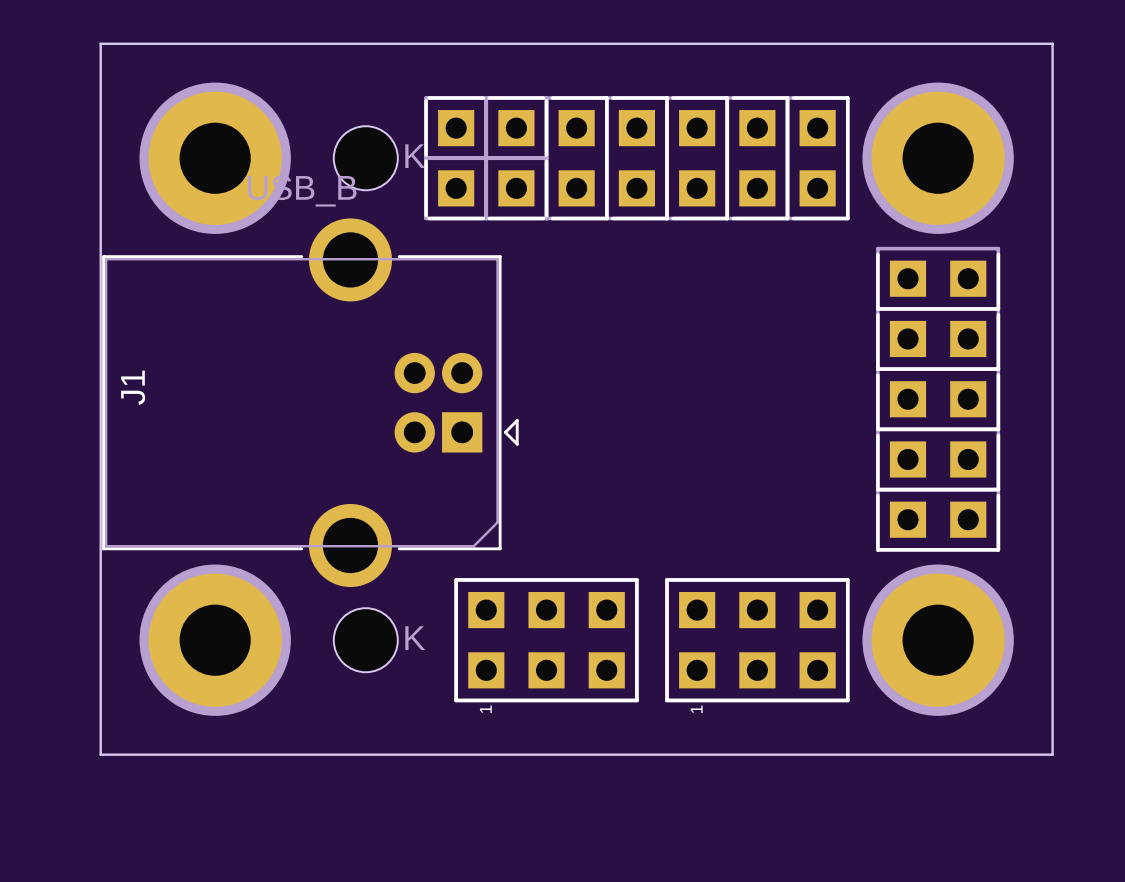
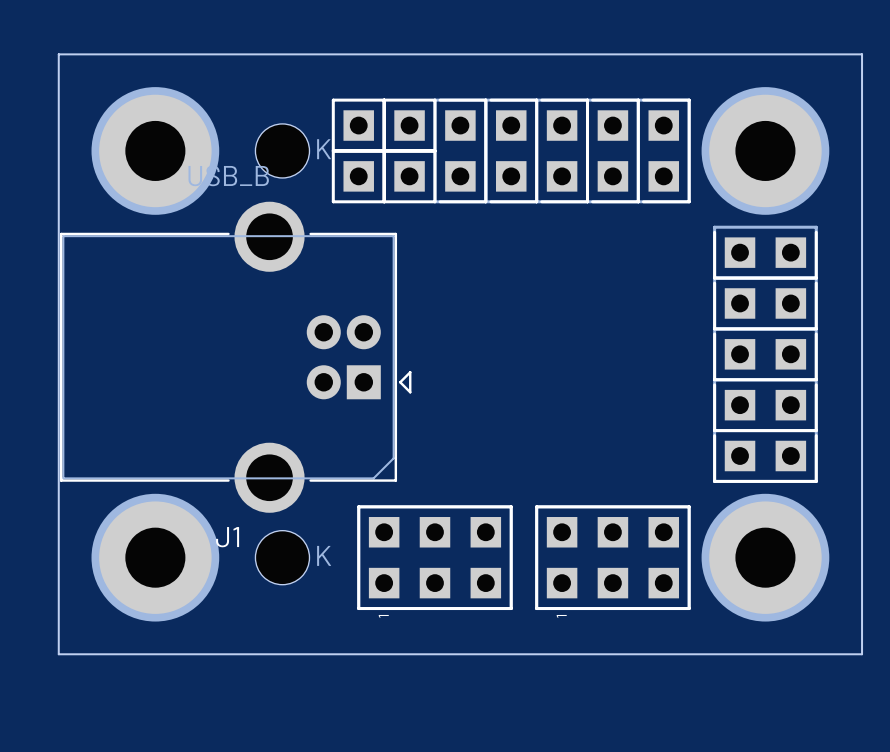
part footprint: [424, 96, 489, 161] -> [331, 98, 386, 153]
part footprint: [484, 96, 549, 161] -> [382, 98, 437, 153]
part footprint: [424, 156, 489, 221] -> [331, 149, 386, 204]
part footprint: [484, 156, 549, 221] -> [382, 149, 437, 204]
J1 name rotation: 0° (133, 387) -> 90° clockwise (227, 537)
J1 name position: J1 (133, 387) -> J1 (227, 537)

